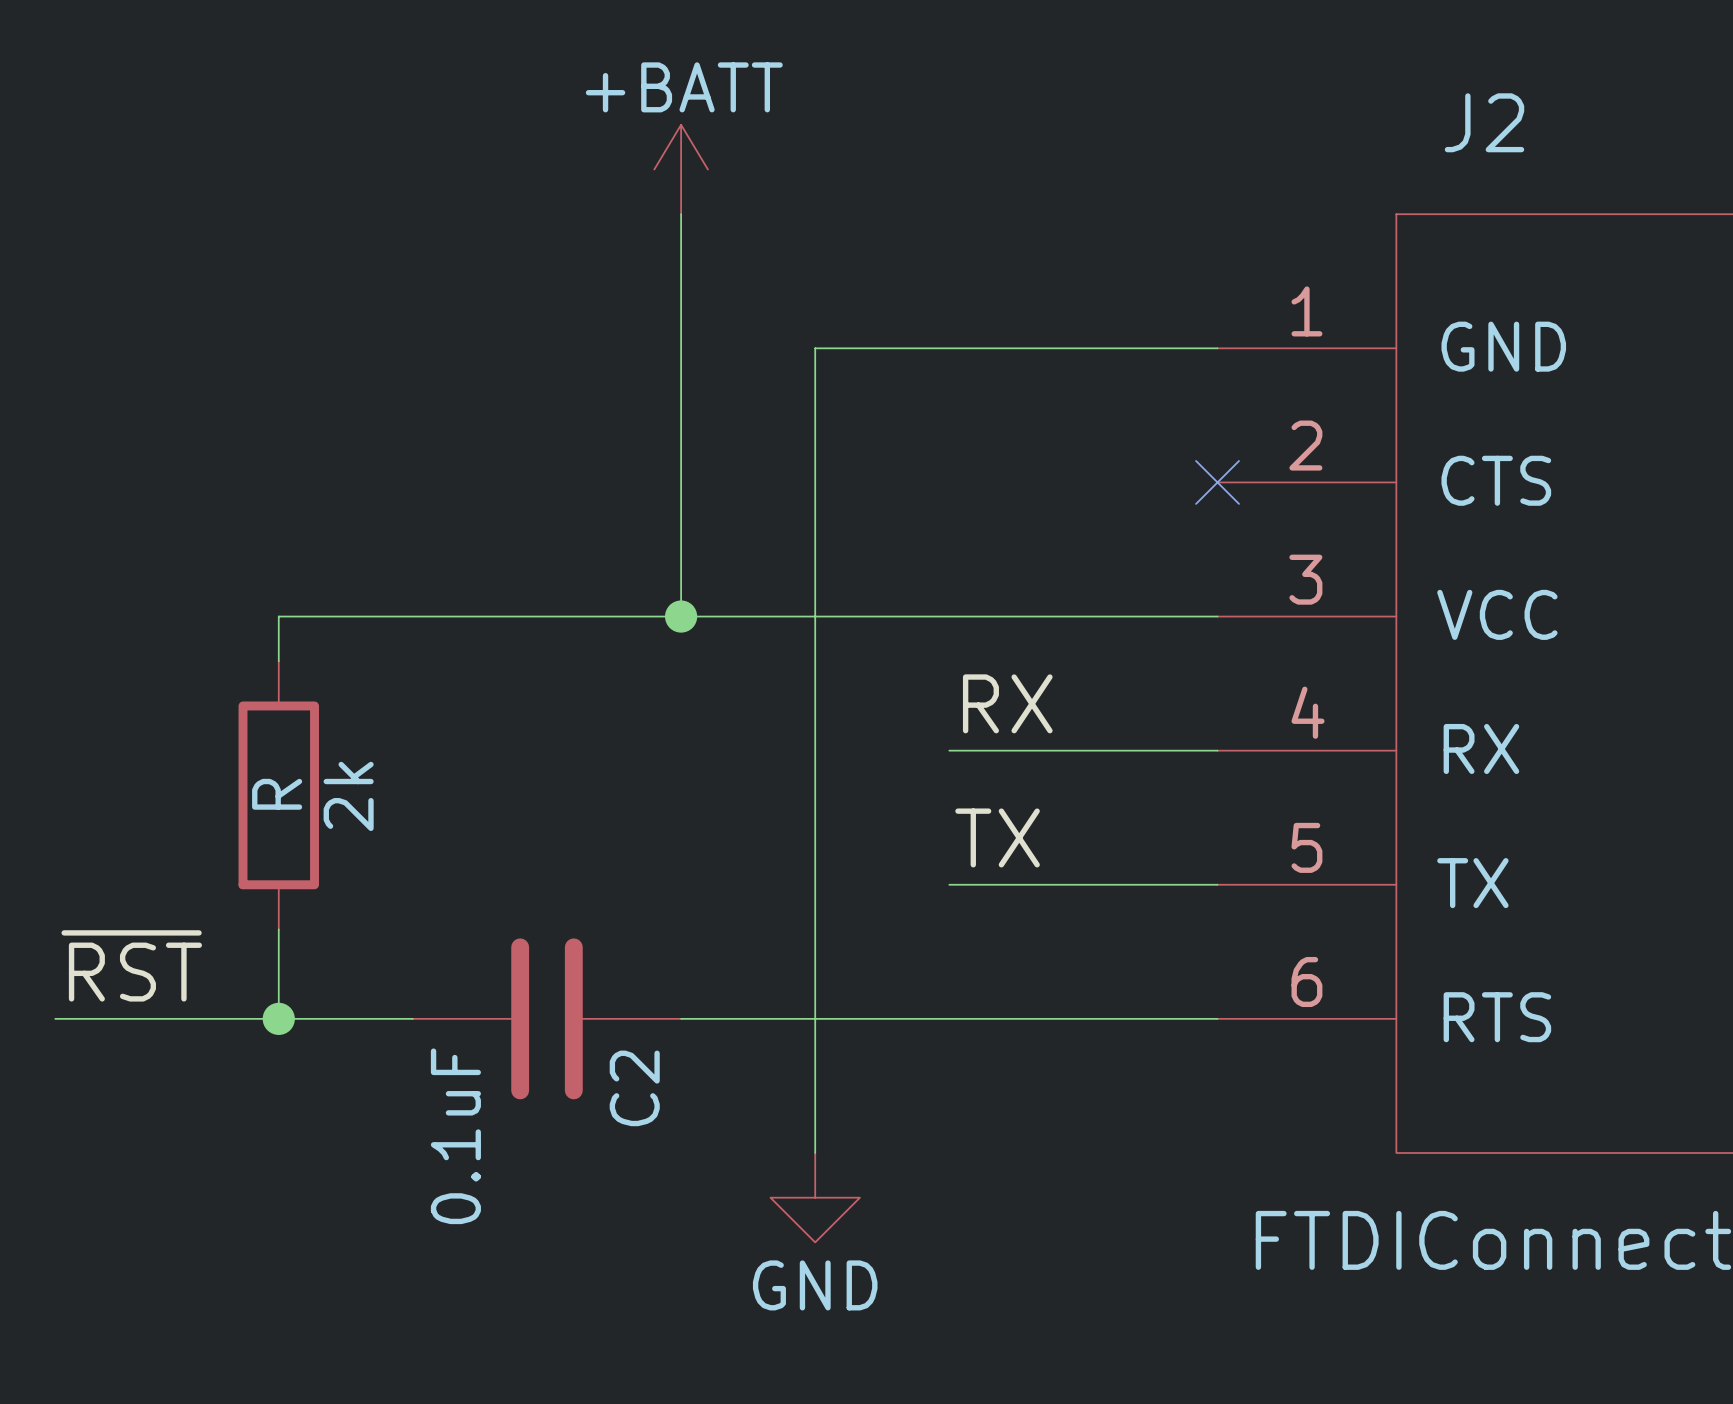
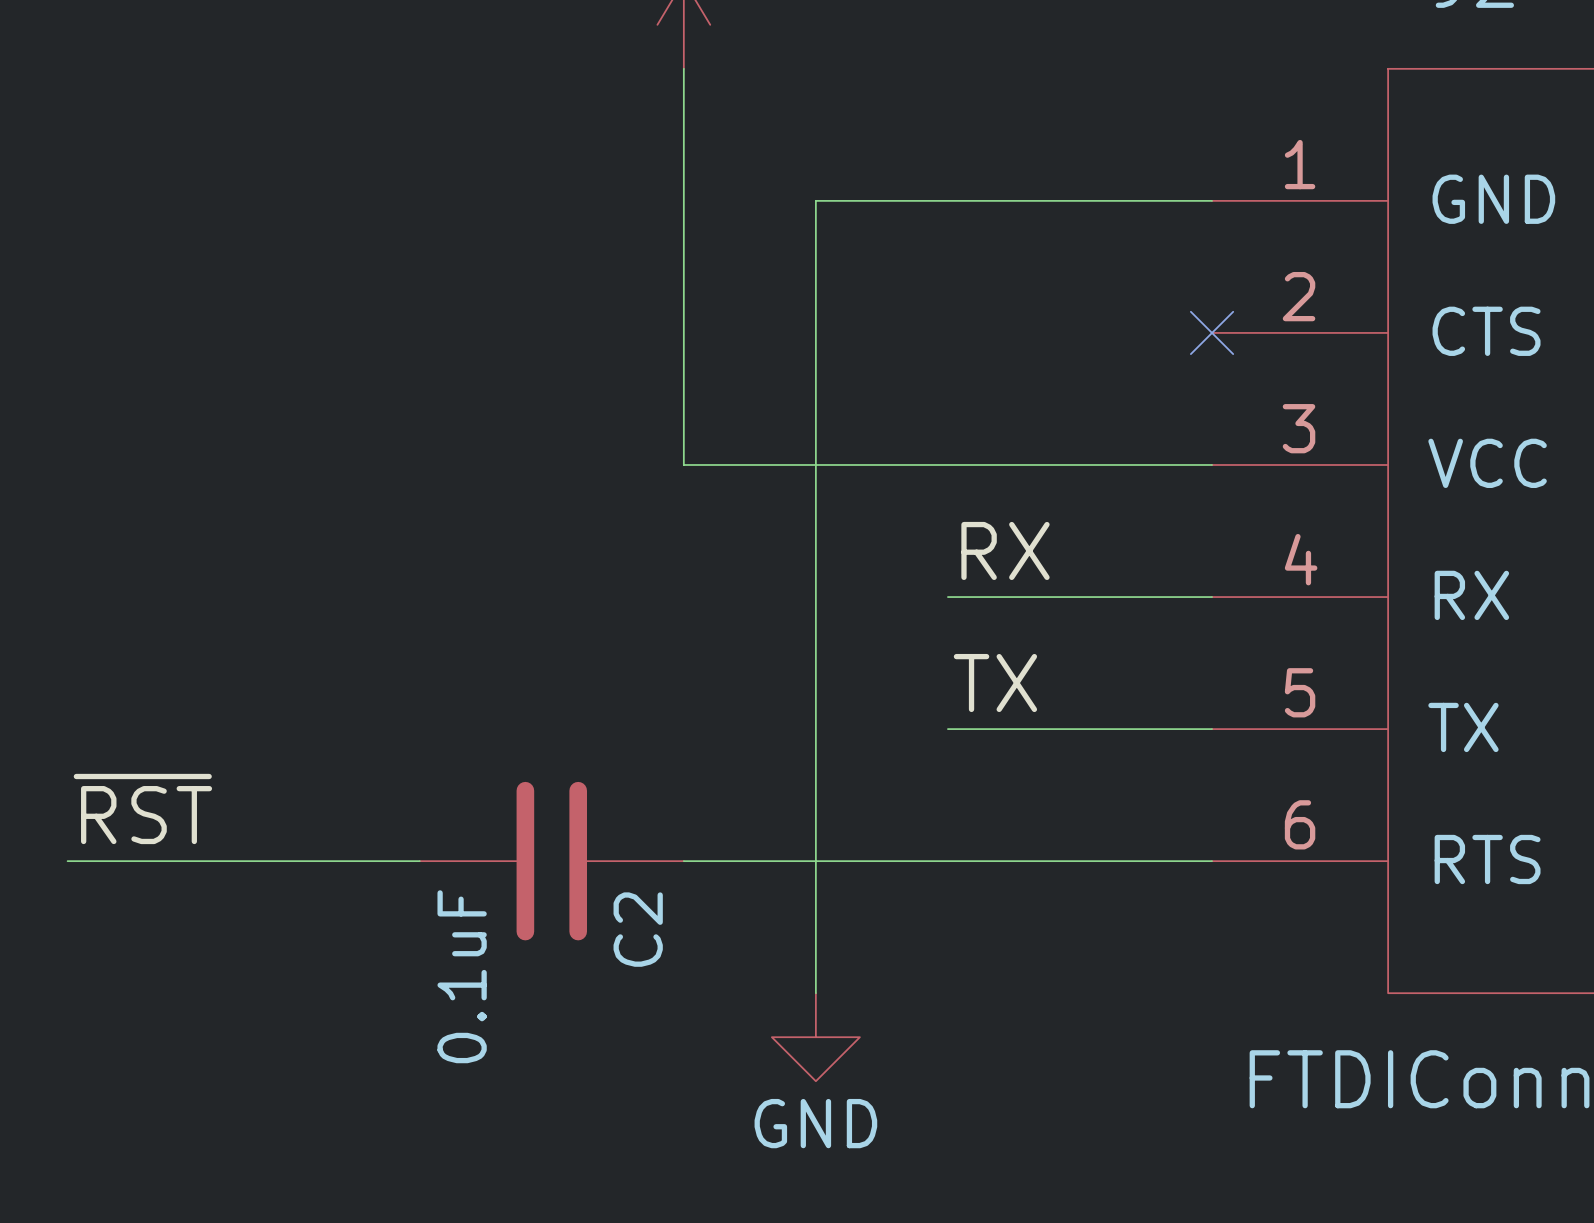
wire: (681, 616) (278, 616) (278, 661) -> none
junction: (681, 616) -> none
2k: R (278, 795) -> none
wire: (278, 929) (278, 1018) -> none
junction: (278, 1018) -> none

